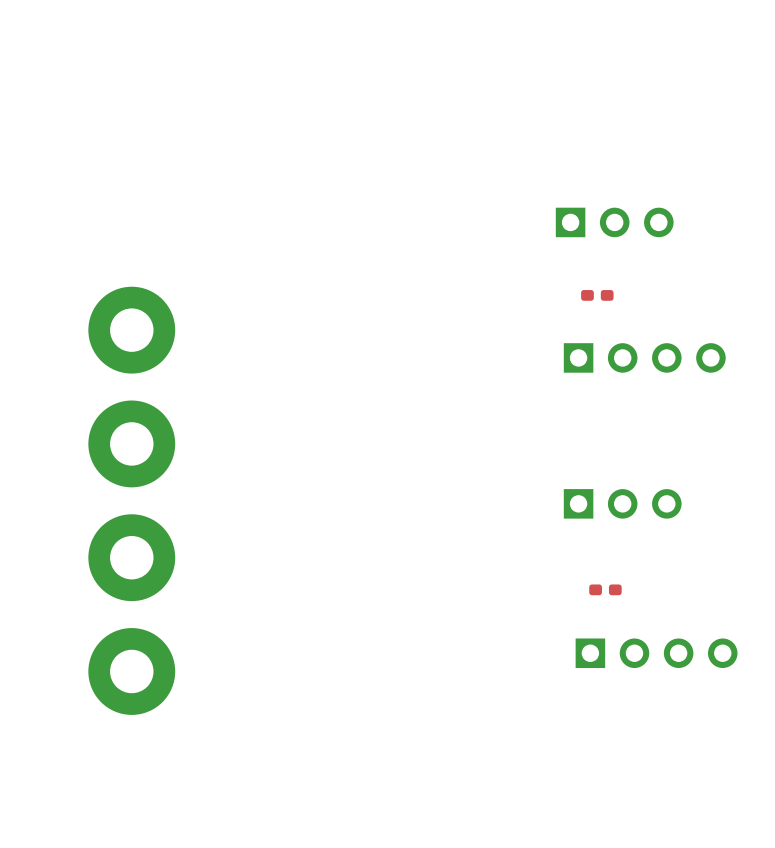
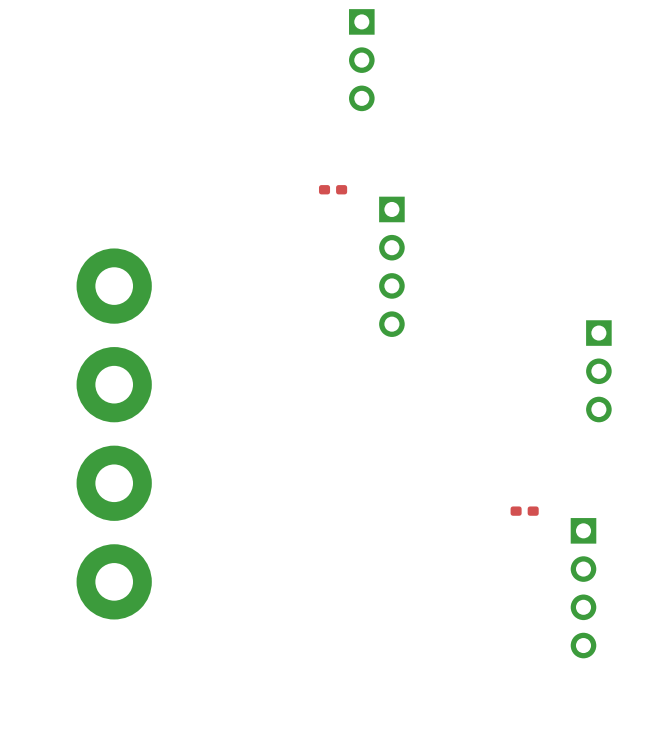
part: none -> (361, 60)
part: (614, 222) -> none
part position: (597, 295) -> (333, 189)
part: none -> (391, 266)
part: (644, 357) -> none
part rotation: 0° (622, 503) -> 90° clockwise (598, 371)
part position: (622, 503) -> (598, 371)
part rotation: 0° (656, 653) -> 90° clockwise (583, 588)

